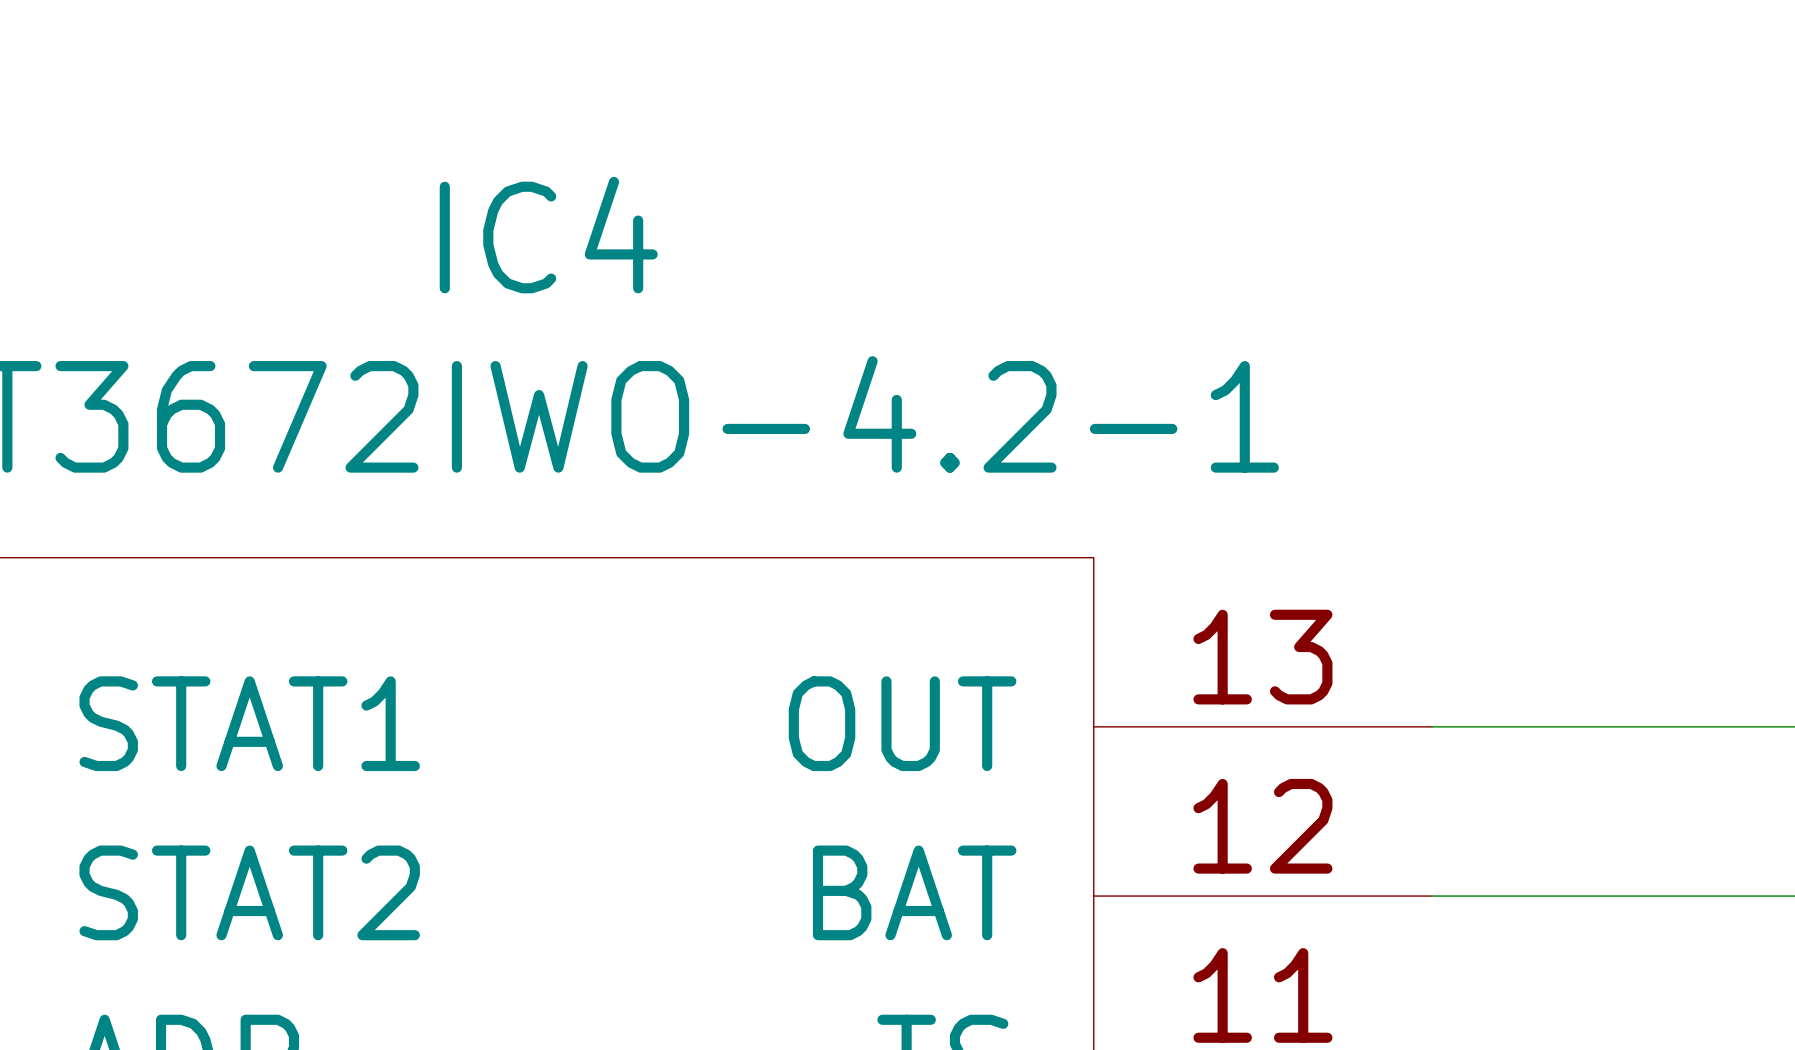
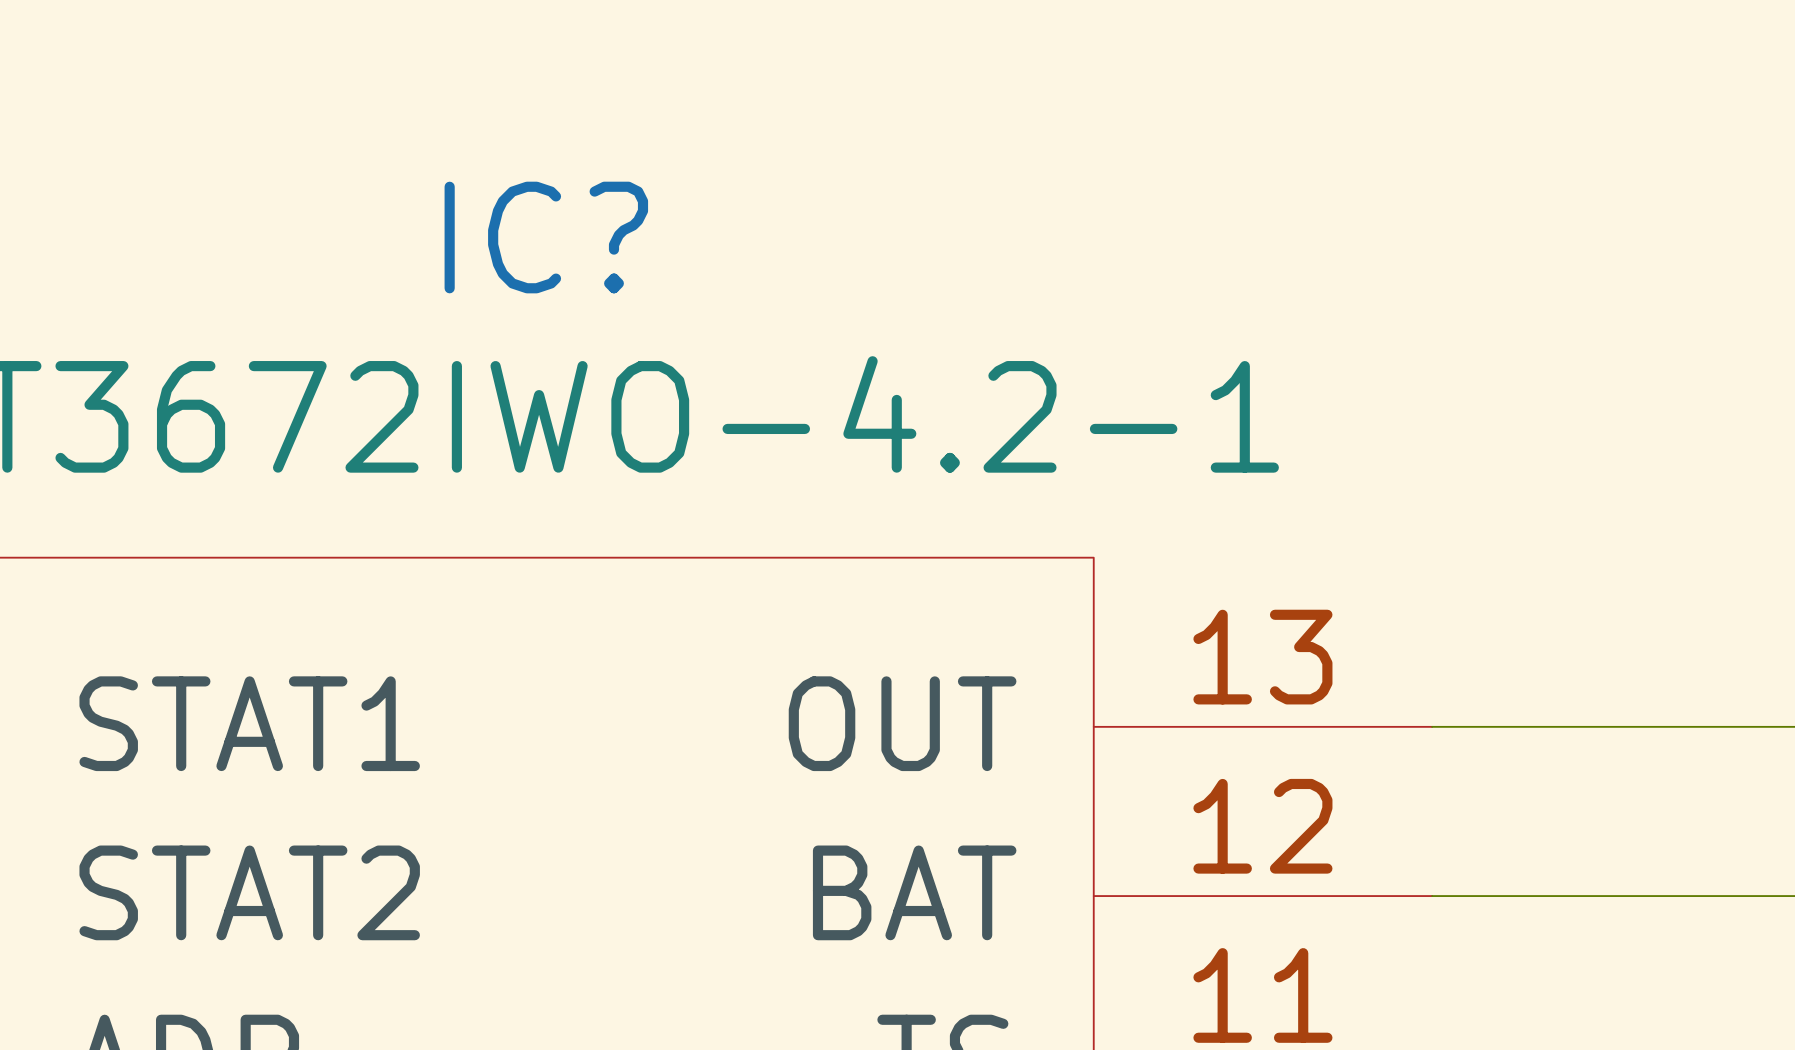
IC4 name: IC4 (548, 235) -> IC? (546, 237)

